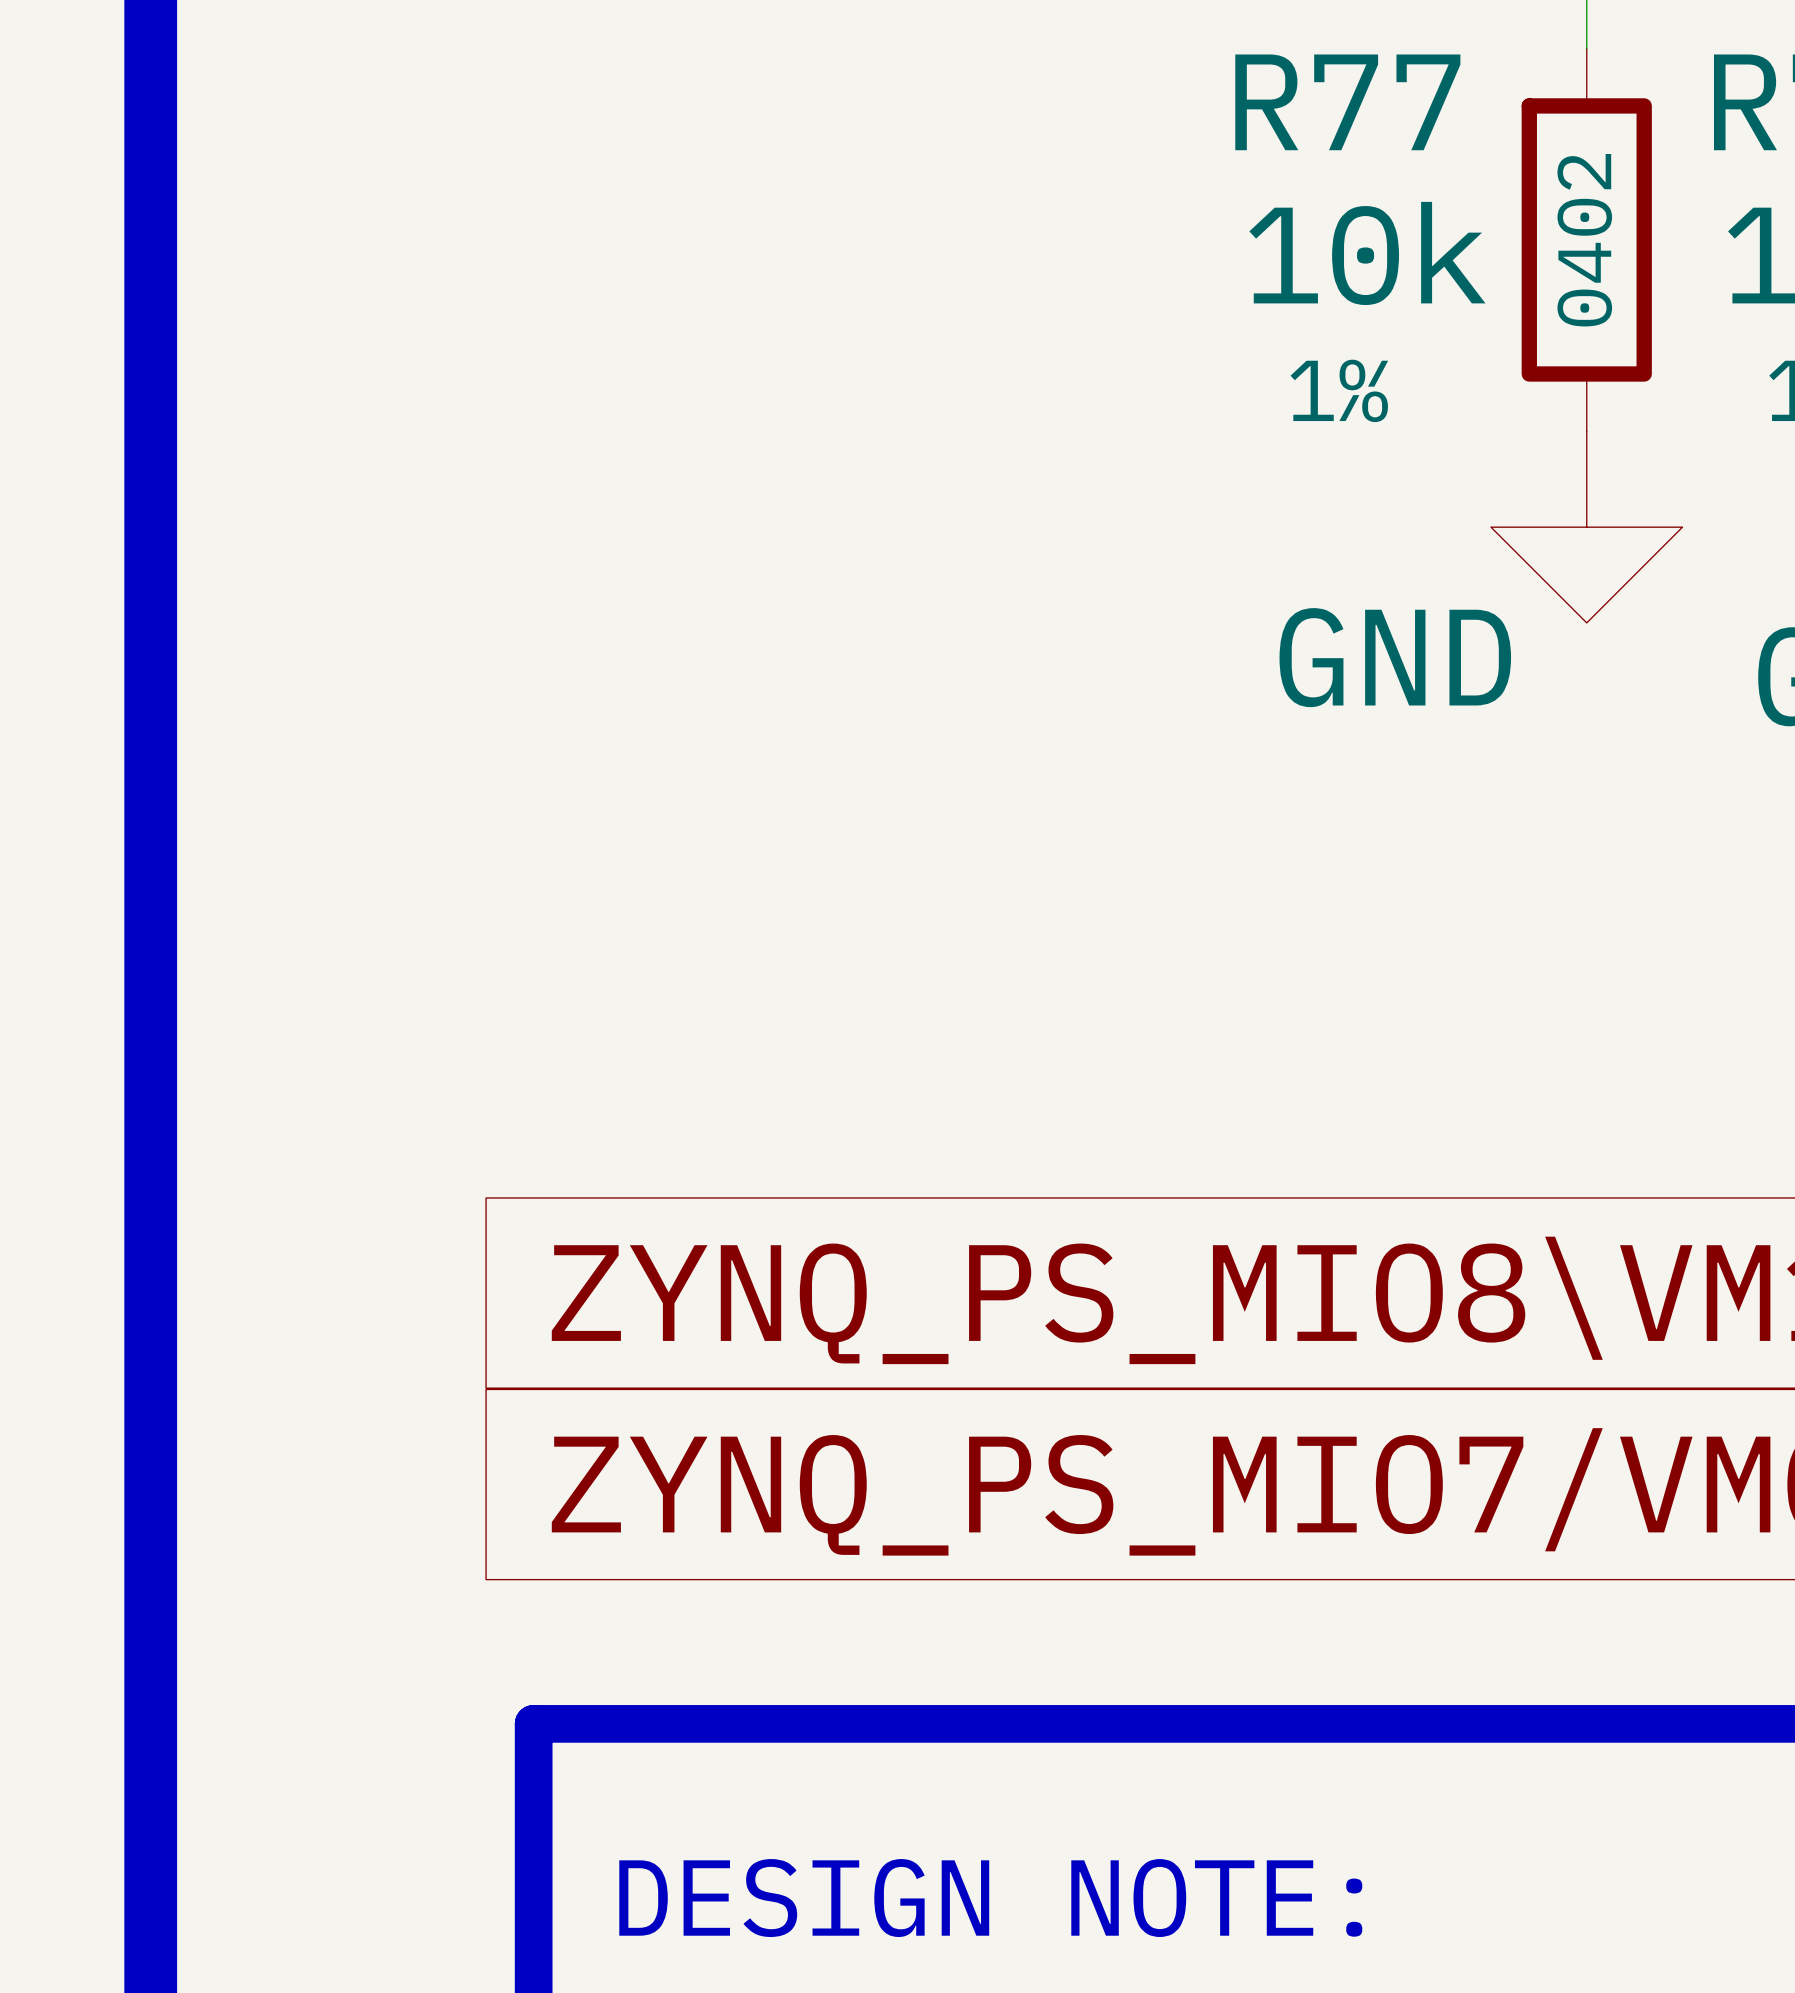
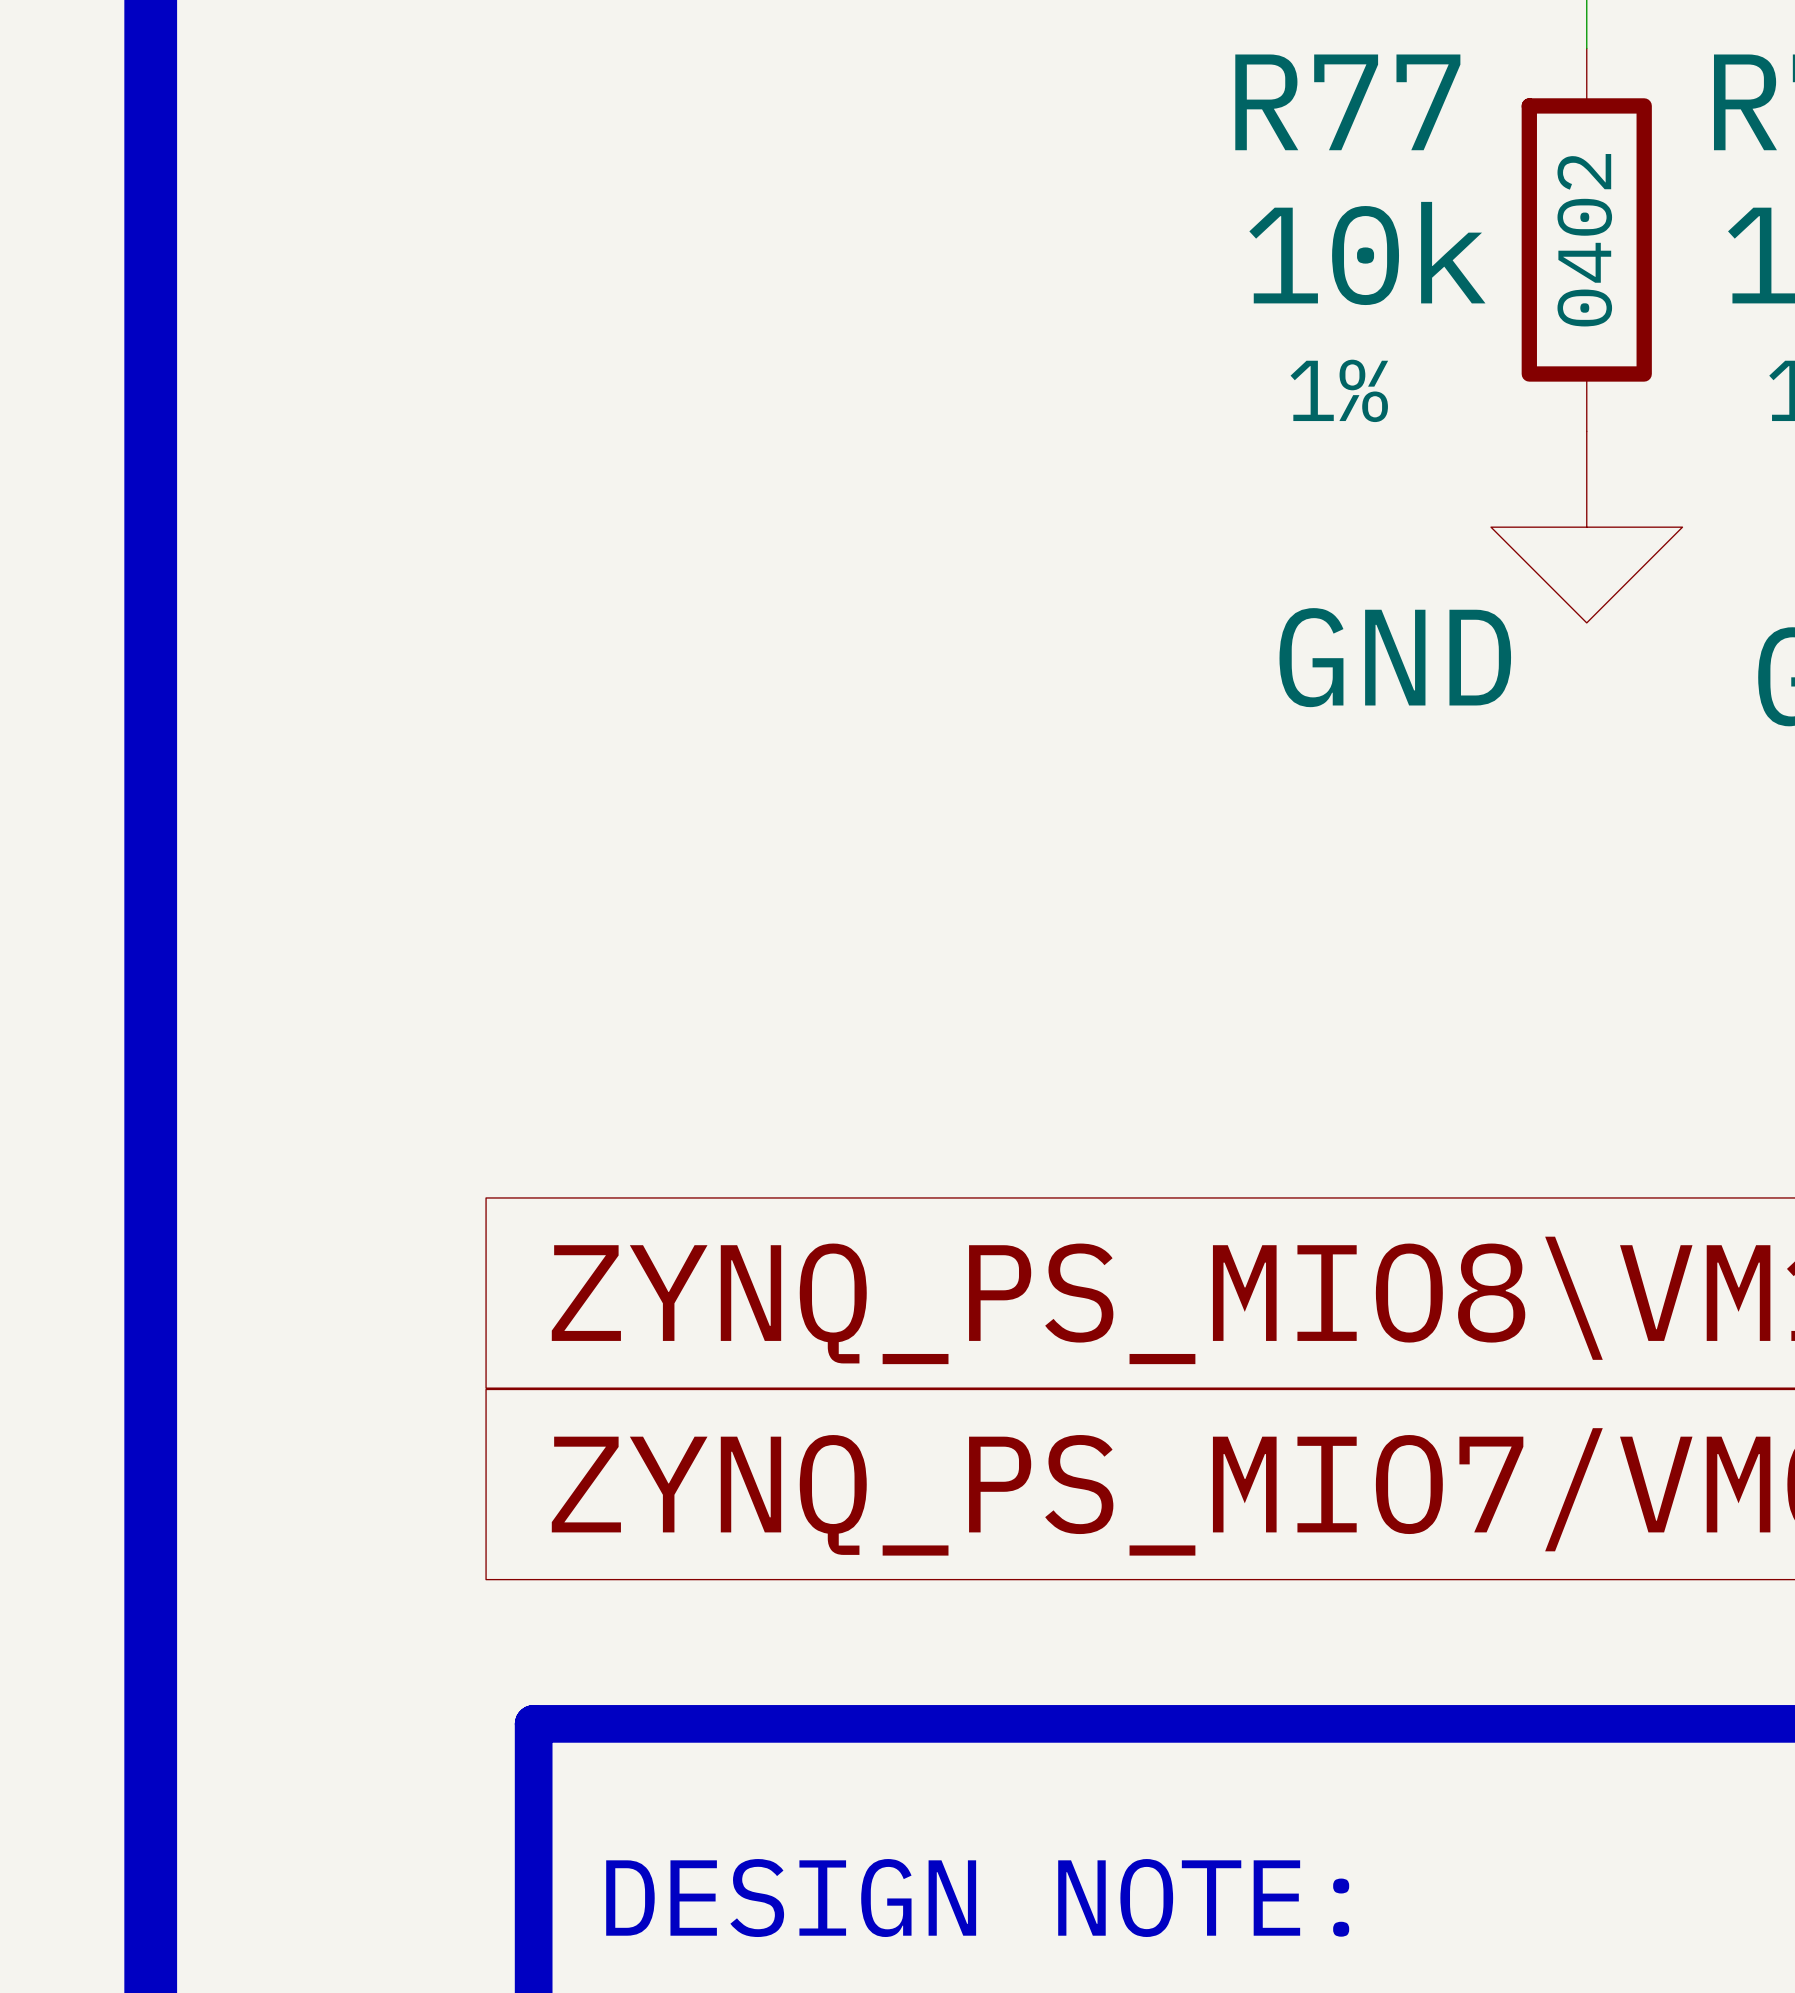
text position: DESIGN NOTE: (990, 1898) -> DESIGN NOTE: (977, 1898)

